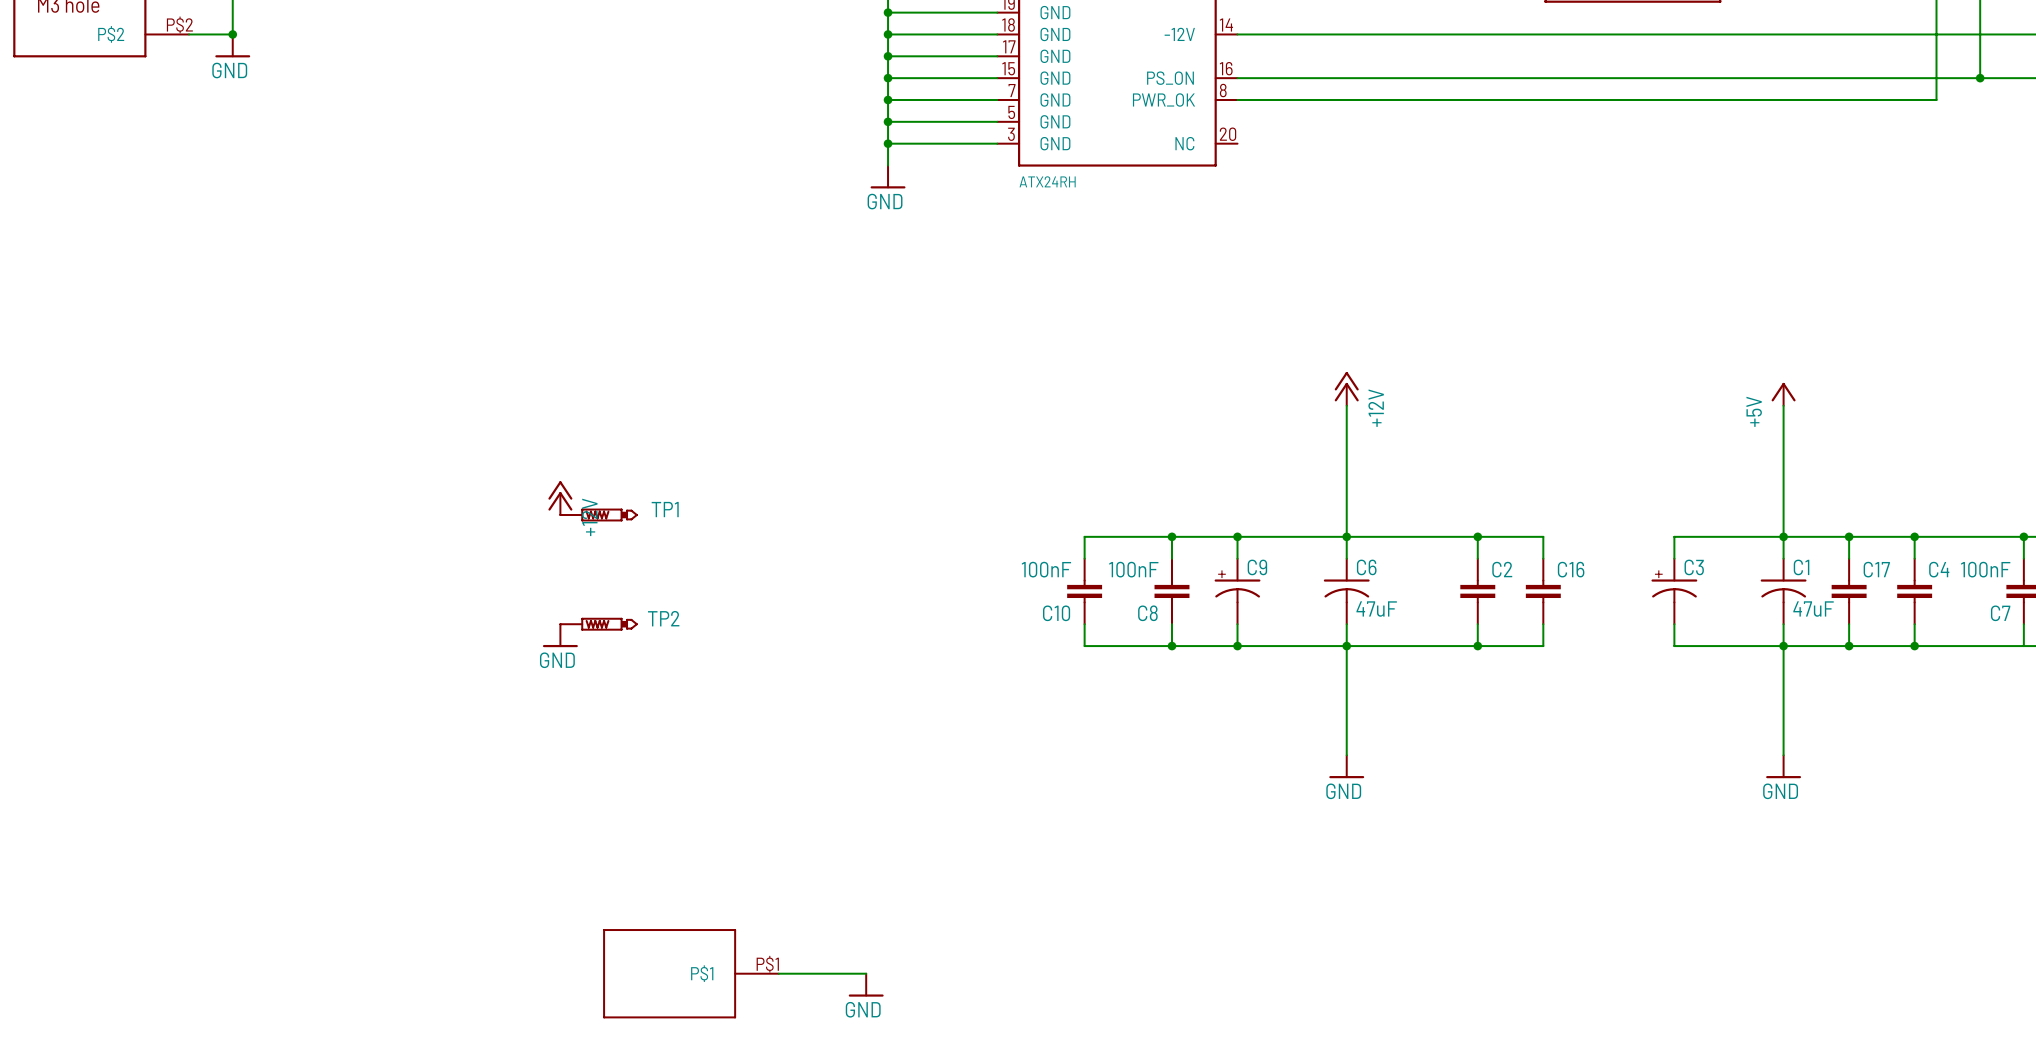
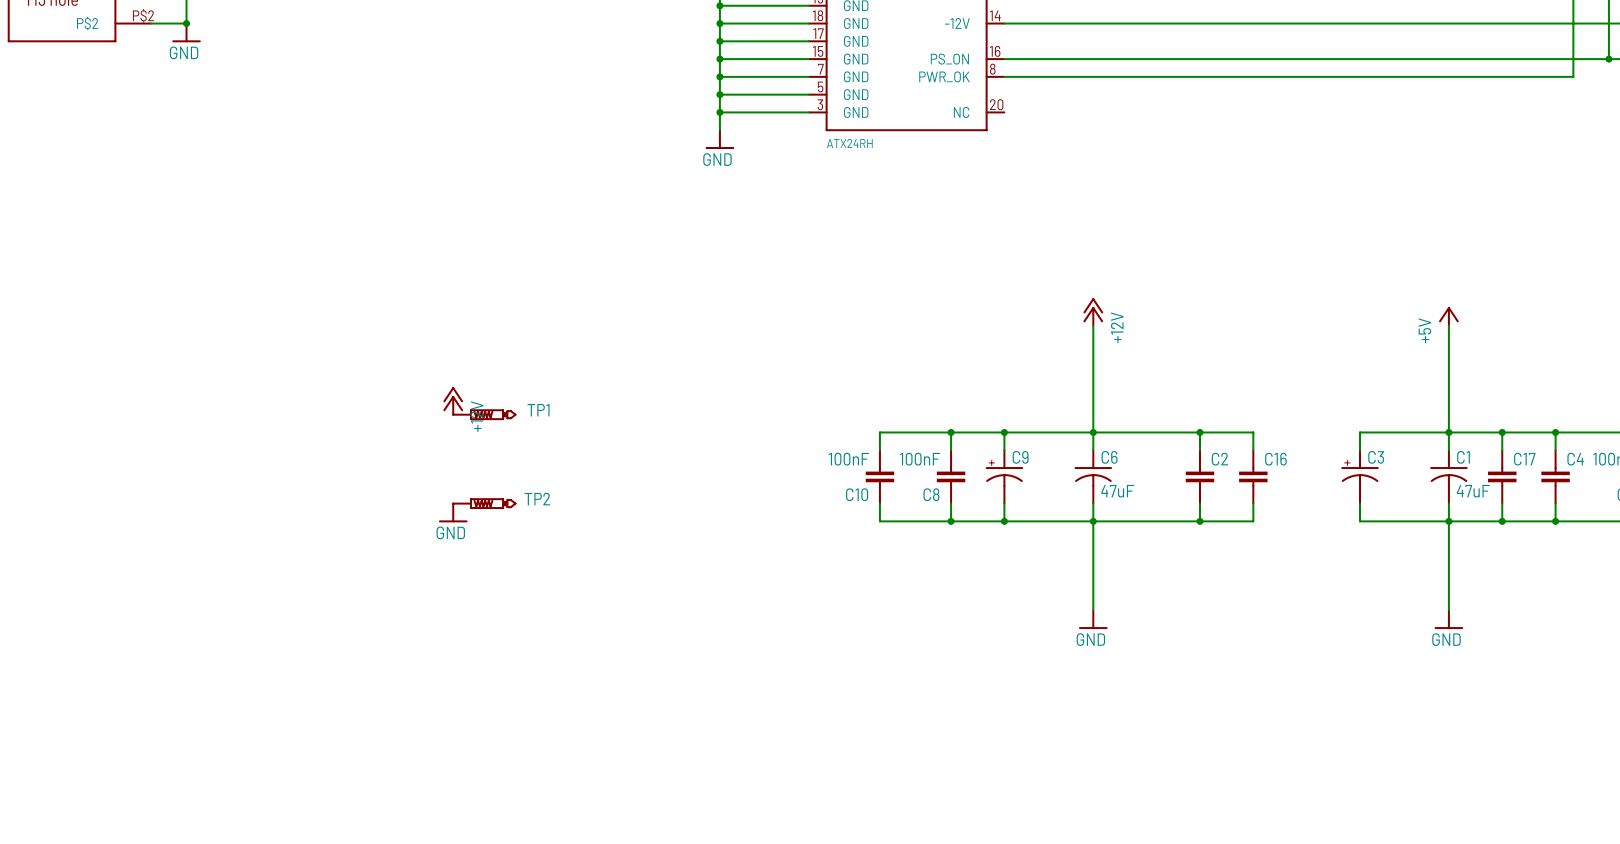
part: (691, 973) -> none
wire: (778, 973) (866, 973) -> none
power symbol: GND (866, 985) -> none

